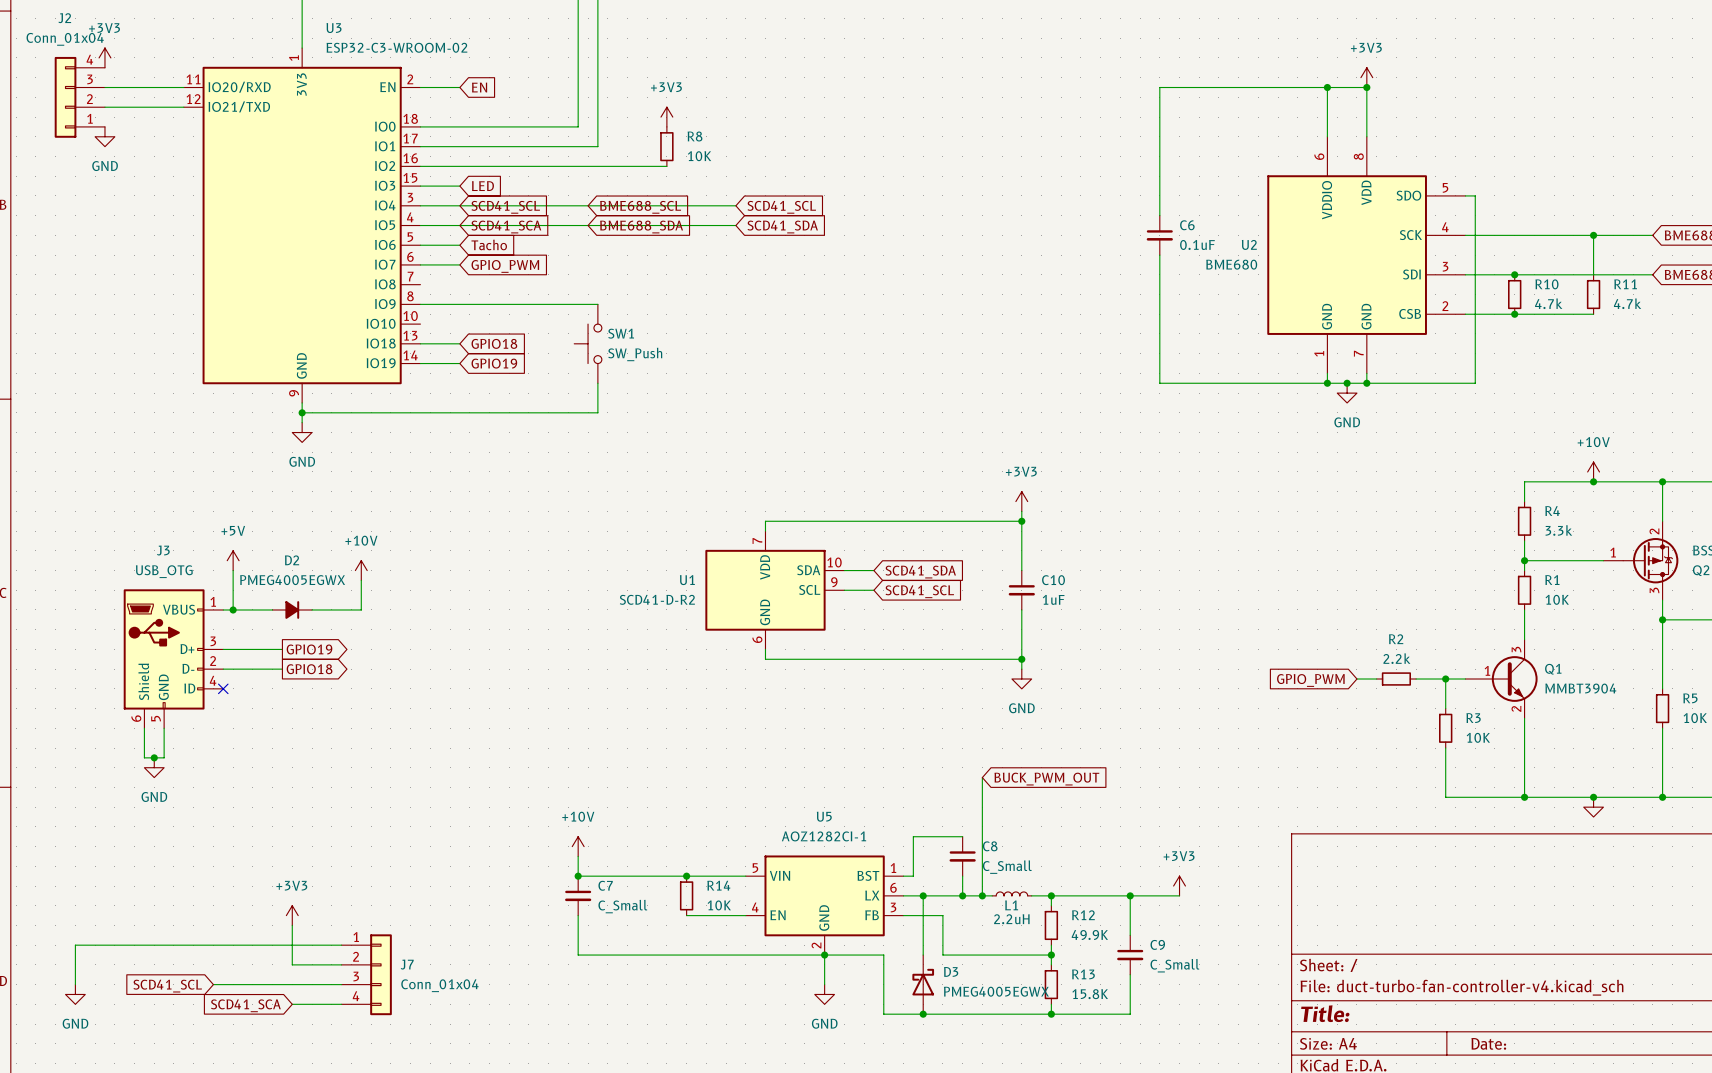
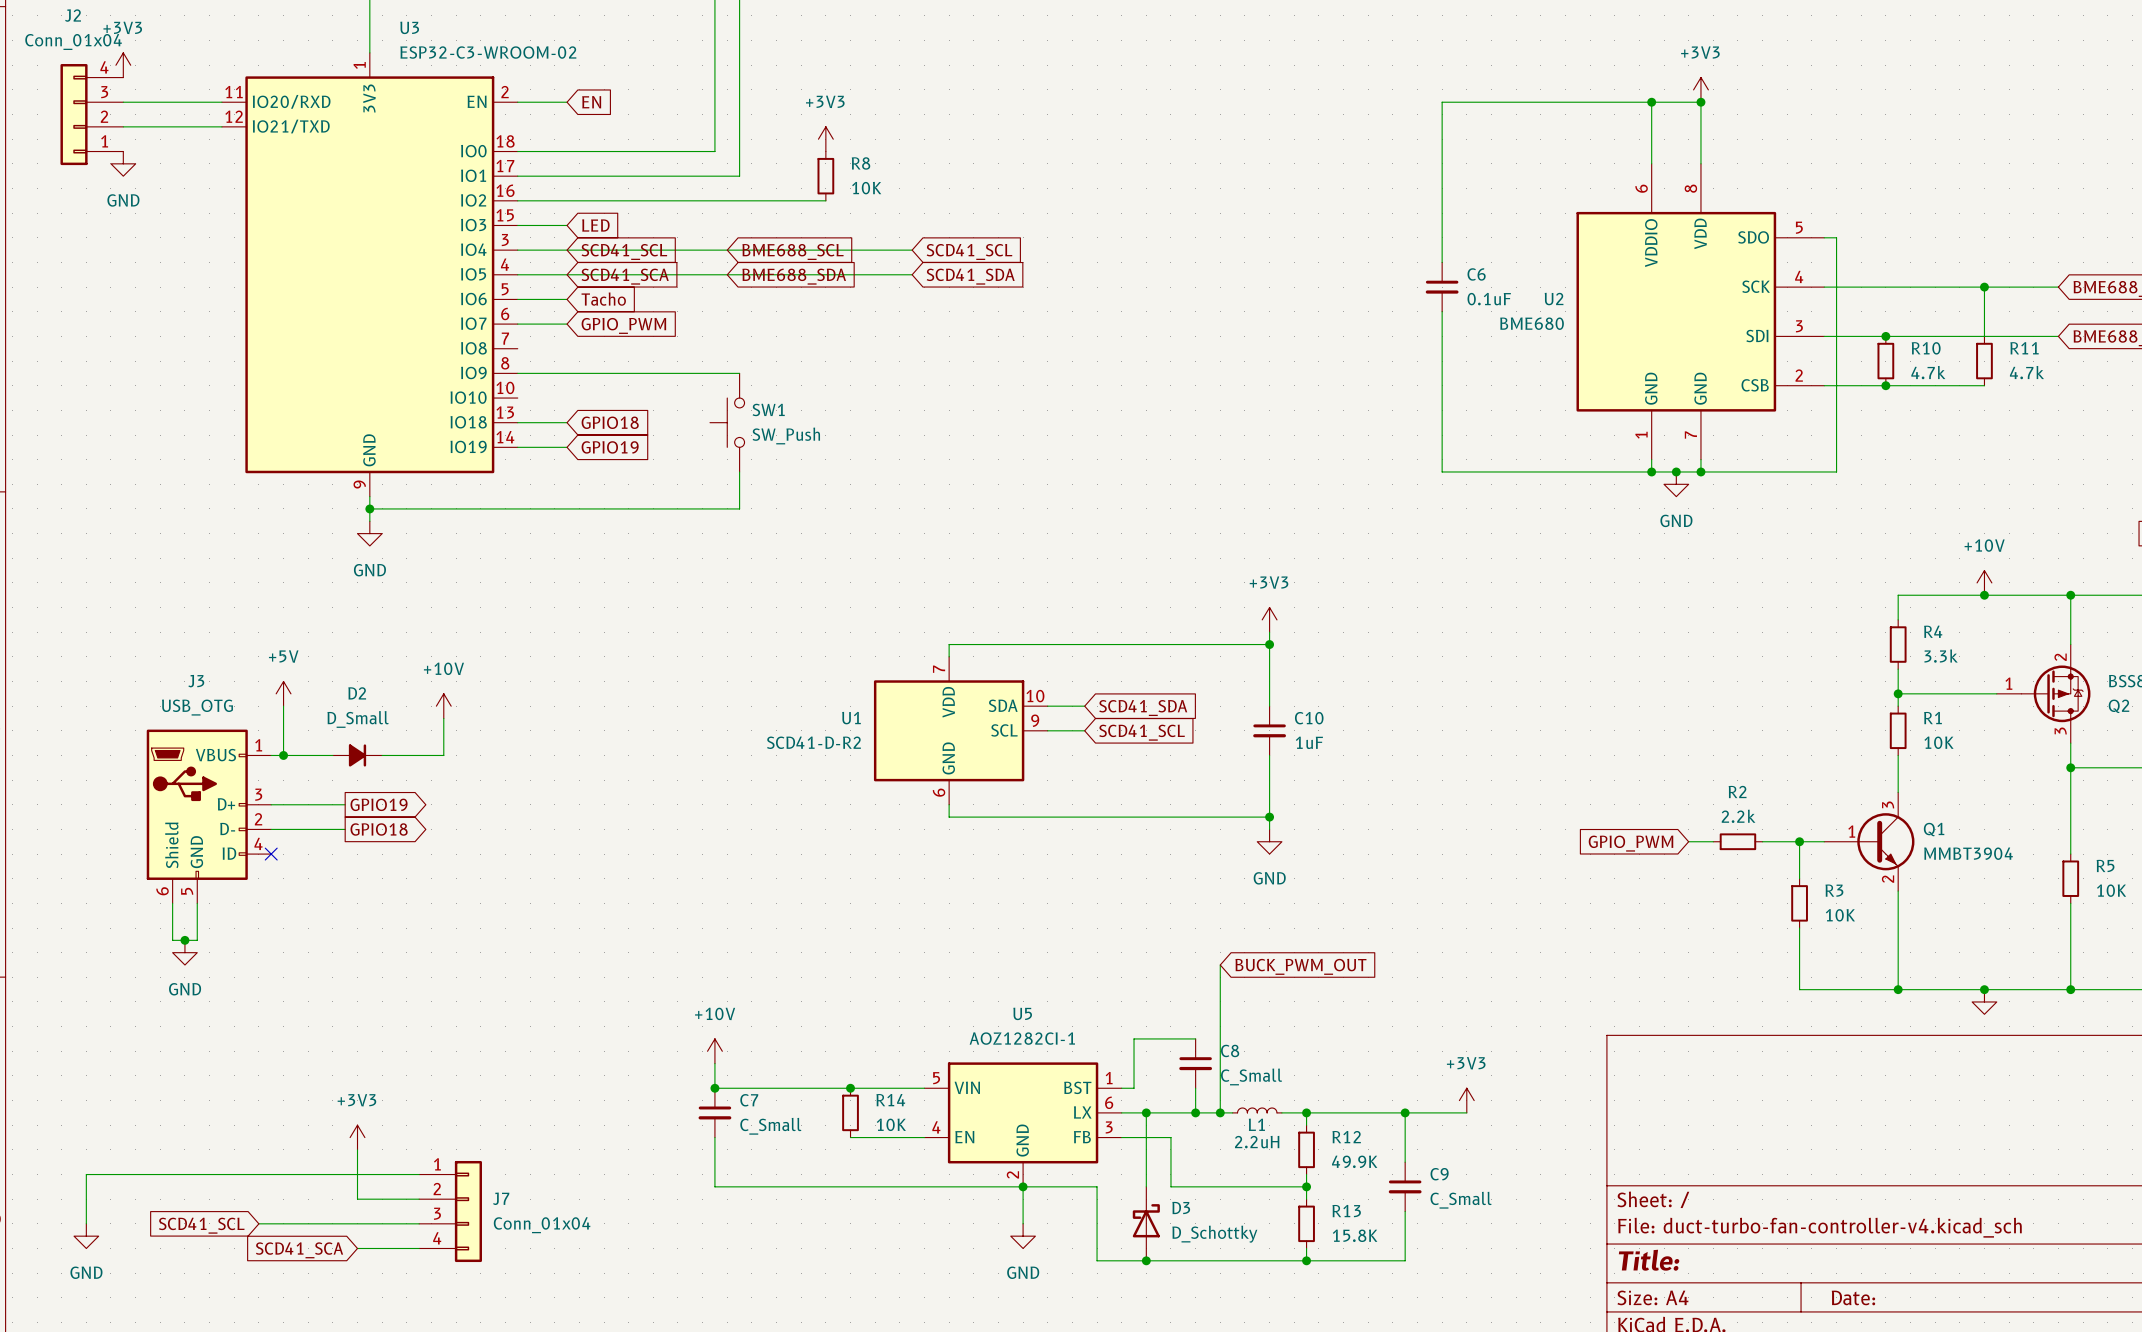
D2 value: PMEG4005EGWX (292, 580) -> D_Small (358, 719)
D3 value: PMEG4005EGWX (996, 991) -> D_Schottky (1214, 1234)

